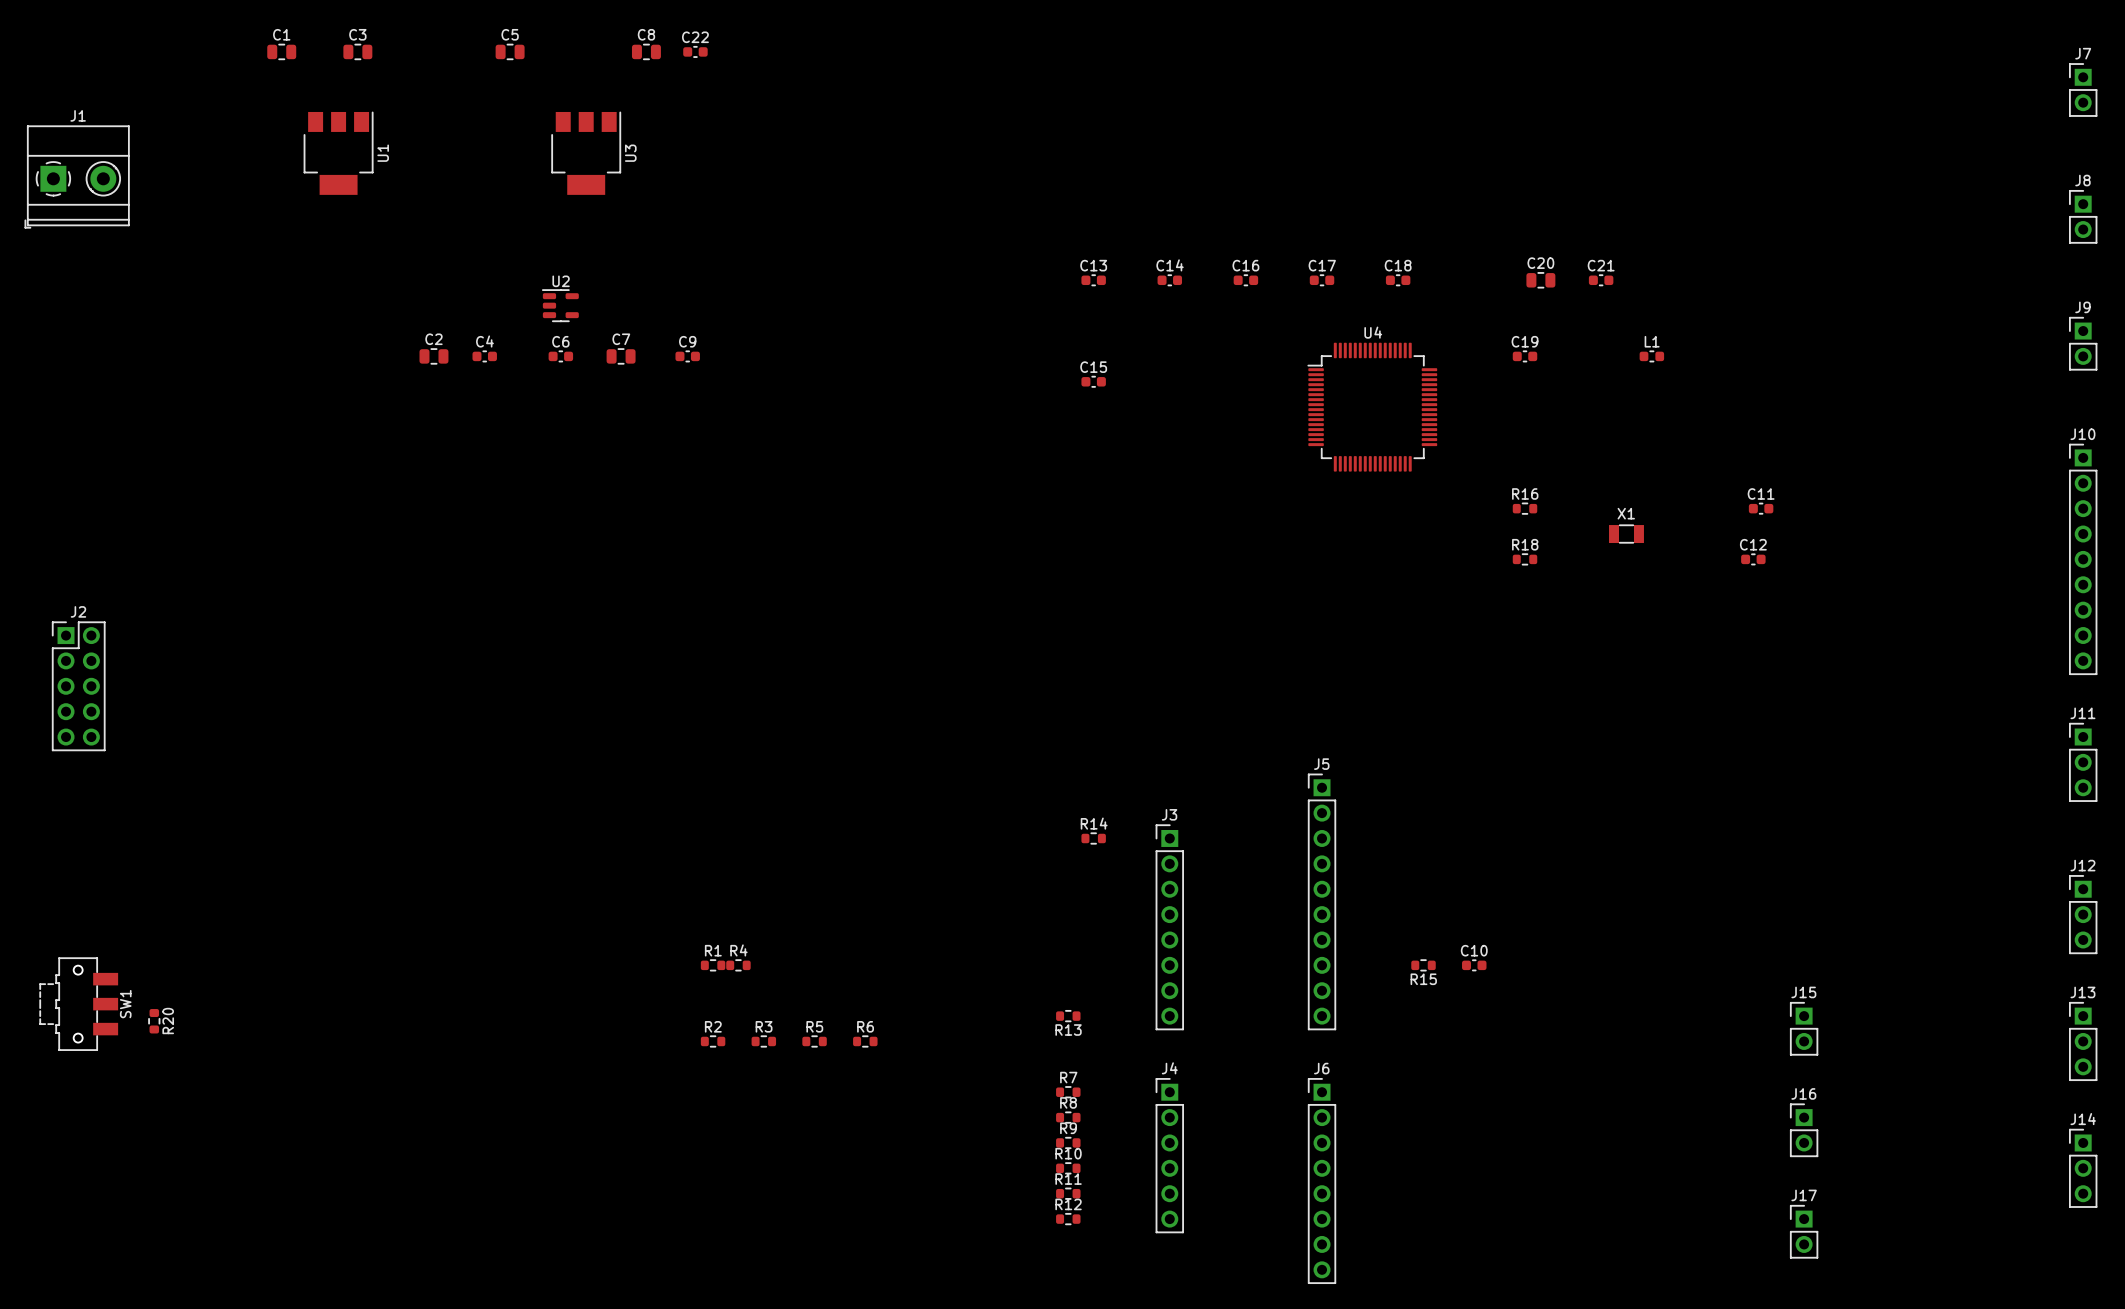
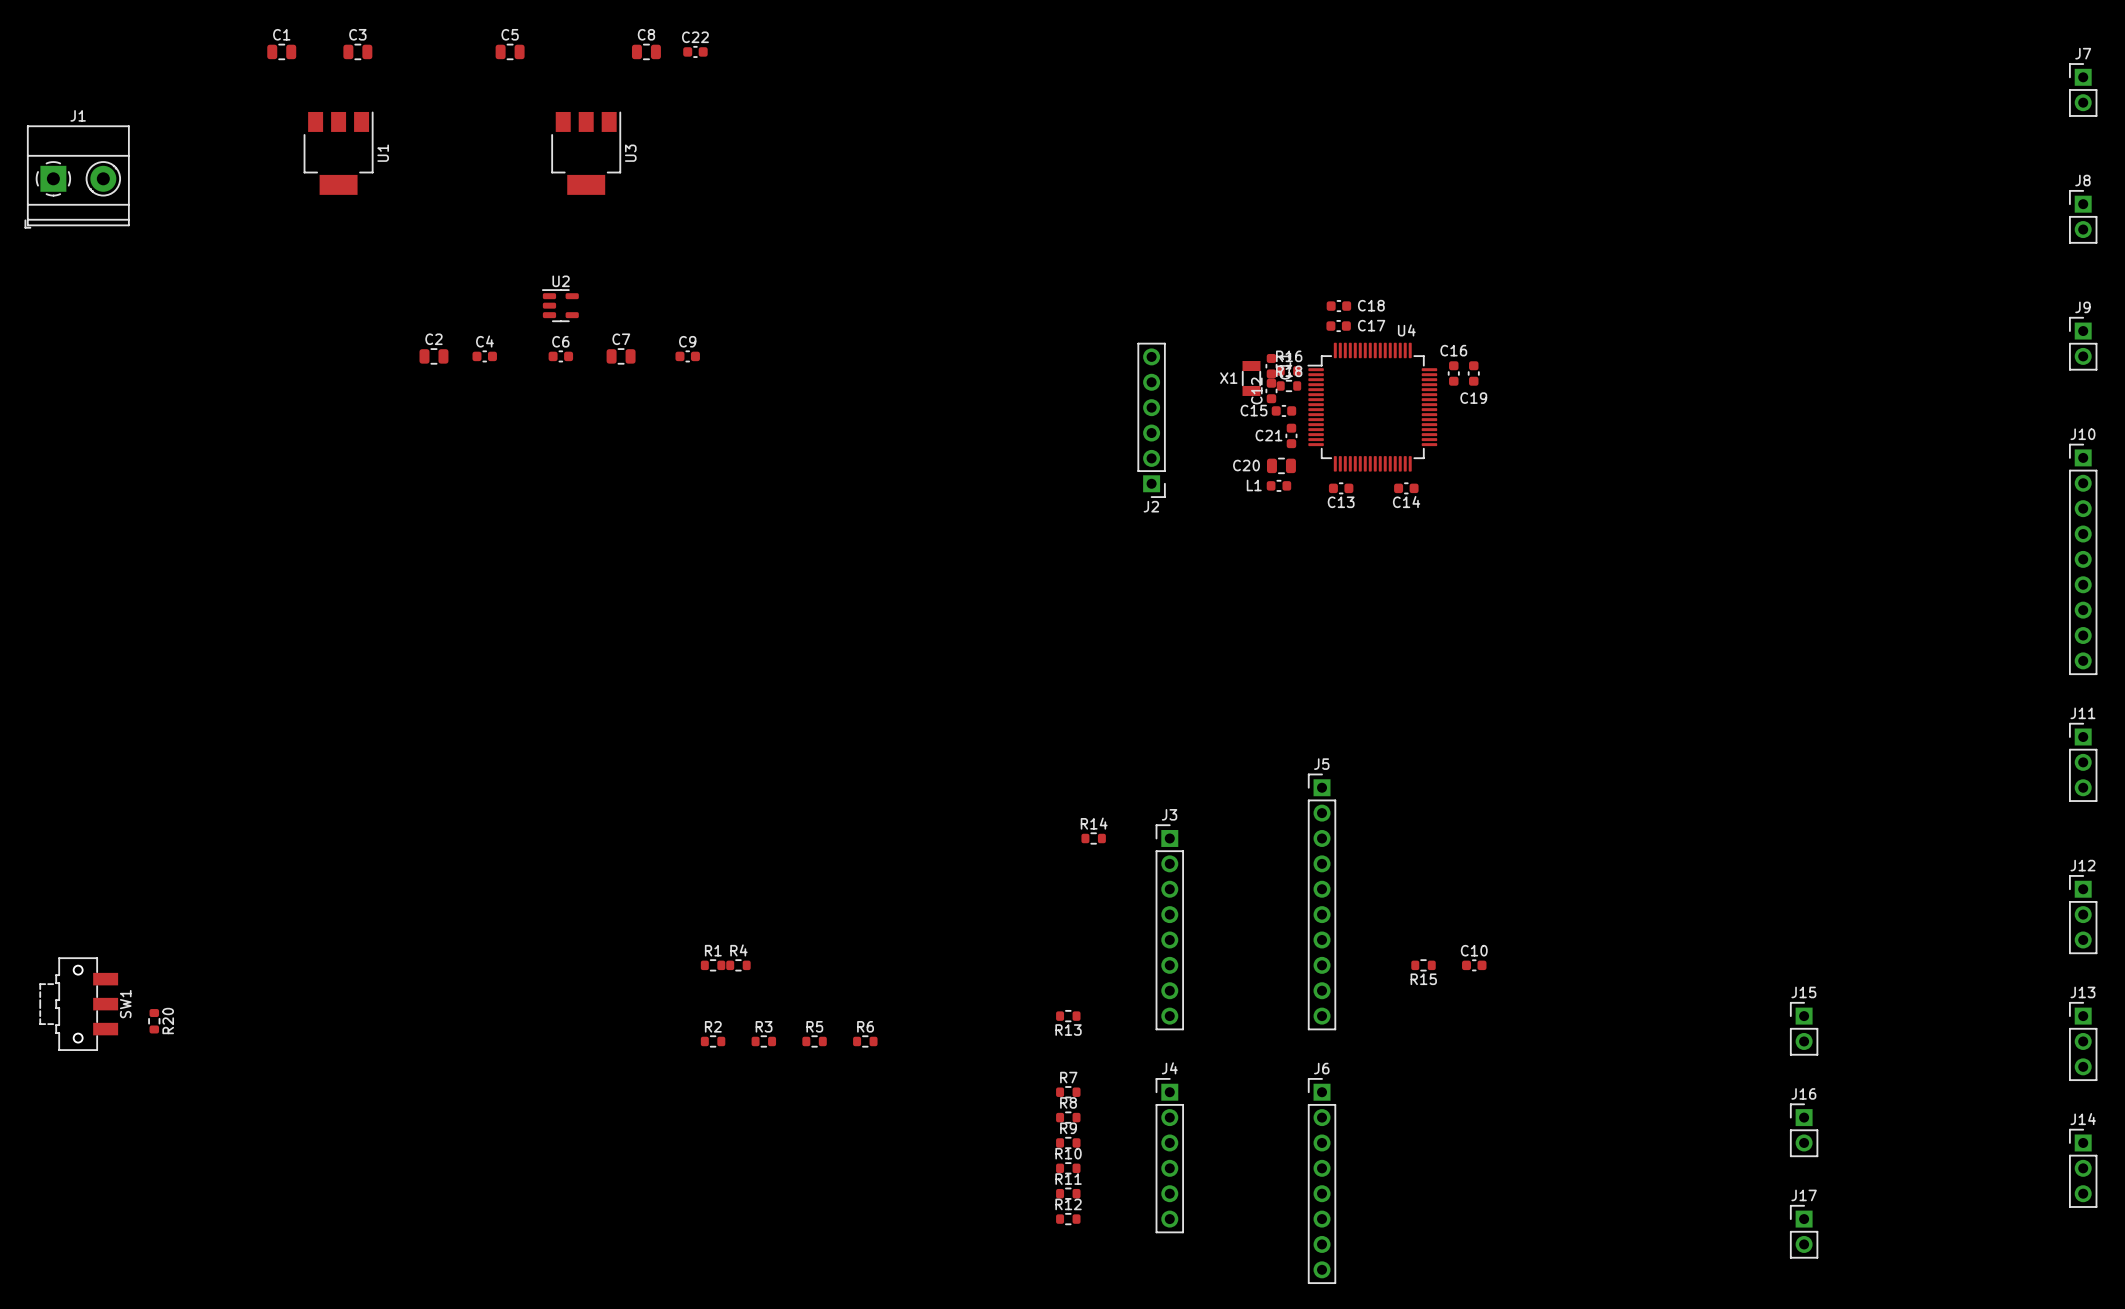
C20 name position: C20 (1540, 263) -> C20 (1246, 465)
C13 name position: C13 (1093, 265) -> C13 (1341, 502)
C14 name position: C14 (1170, 265) -> C14 (1406, 502)
C17 name position: C17 (1322, 265) -> C17 (1371, 325)
C18 name position: C18 (1398, 265) -> C18 (1371, 305)
C21 name position: C21 (1601, 265) -> C21 (1268, 435)
C13 position: (1093, 280) -> (1341, 488)
C14 position: (1169, 280) -> (1406, 488)
C16 rotation: 0° (1245, 280) -> 90° clockwise (1453, 373)
C16 position: (1245, 280) -> (1453, 373)
C17 position: (1322, 280) -> (1338, 326)
C18 position: (1398, 280) -> (1338, 306)
C20 position: (1540, 280) -> (1281, 465)
C21 rotation: 0° (1601, 280) -> 90° clockwise (1291, 435)
C21 position: (1601, 280) -> (1291, 435)
U4 name position: U4 (1373, 332) -> U4 (1406, 330)
C19 name position: C19 (1525, 341) -> C19 (1473, 398)
L1 name position: L1 (1652, 341) -> L1 (1254, 485)
C19 rotation: 0° (1525, 356) -> 90° clockwise (1473, 373)
C19 position: (1525, 356) -> (1473, 373)
L1 position: (1651, 356) -> (1278, 485)
C15 name position: C15 (1093, 367) -> C15 (1253, 410)
C15 position: (1093, 381) -> (1283, 410)
R16 position: (1525, 508) -> (1288, 370)
C11 rotation: 0° (1761, 508) -> 90° clockwise (1271, 366)
C11 position: (1761, 508) -> (1271, 366)
X1 name position: X1 (1626, 513) -> X1 (1228, 378)
X1 rotation: 0° (1626, 534) -> 90° clockwise (1251, 378)
X1 position: (1626, 534) -> (1251, 378)
C12 name position: C12 (1753, 544) -> C12 (1256, 390)
R18 position: (1525, 559) -> (1288, 385)
C12 rotation: 0° (1753, 559) -> 90° clockwise (1271, 390)
C12 position: (1753, 559) -> (1271, 390)
J2 name position: J2 (78, 611) -> J2 (1151, 506)
J2 footprint: [52, 621, 106, 751] -> [1137, 343, 1166, 498]

